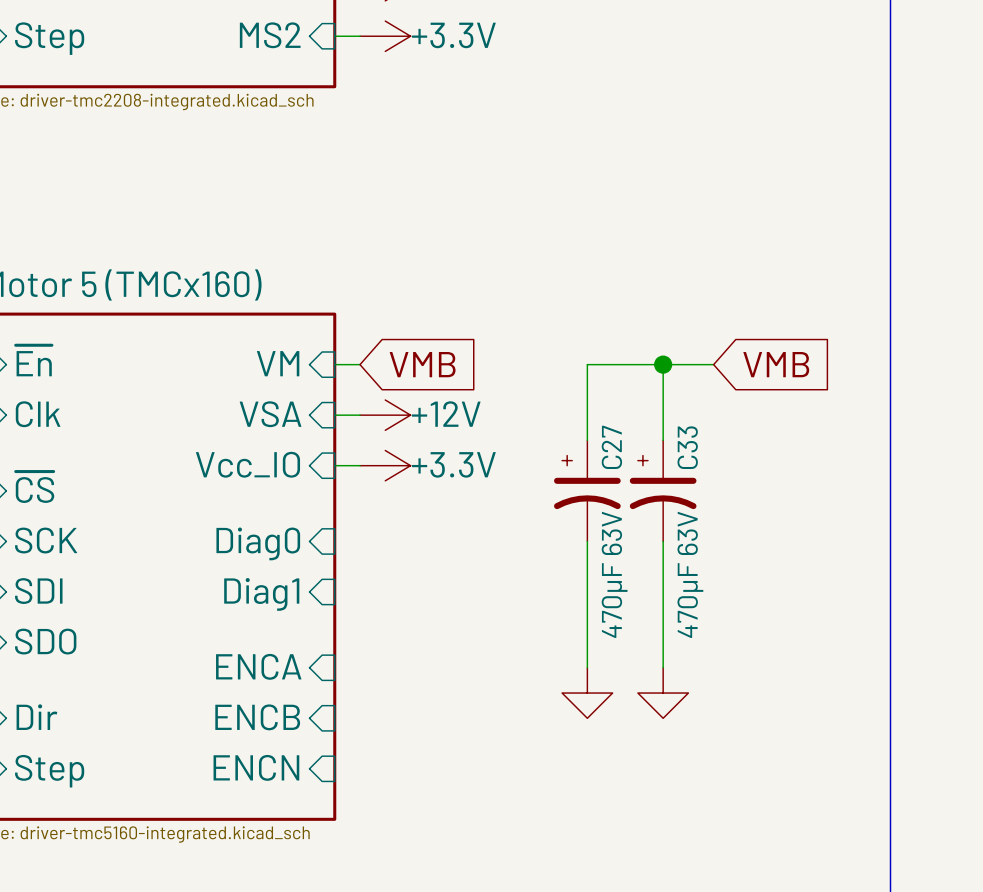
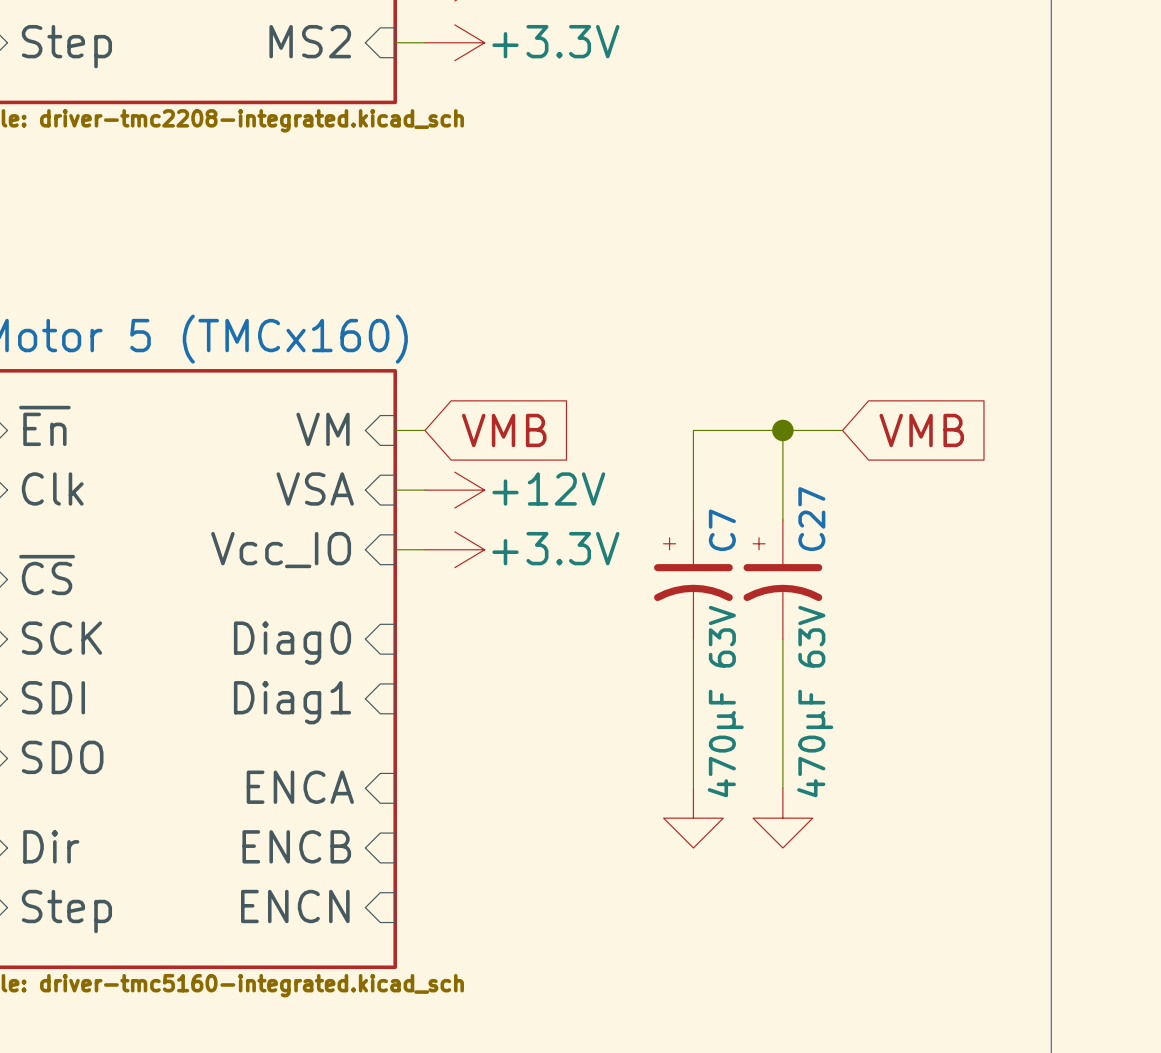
C27 name: C27 (611, 447) -> C7 (722, 530)
C33 name: C33 (687, 447) -> C27 (811, 519)

